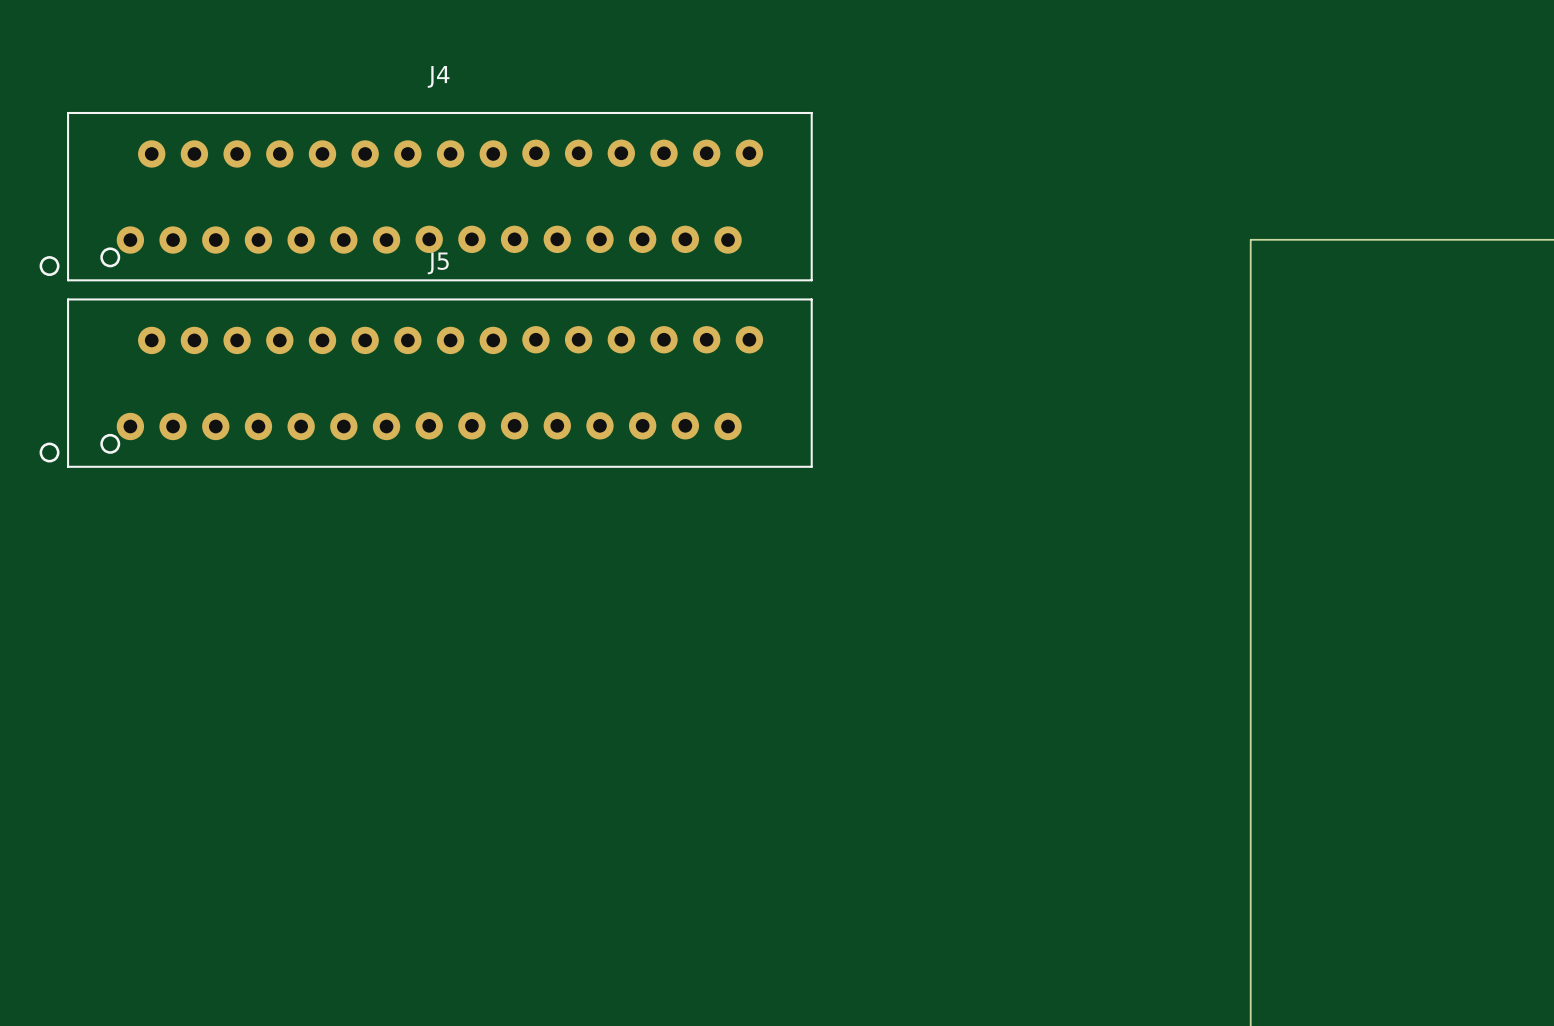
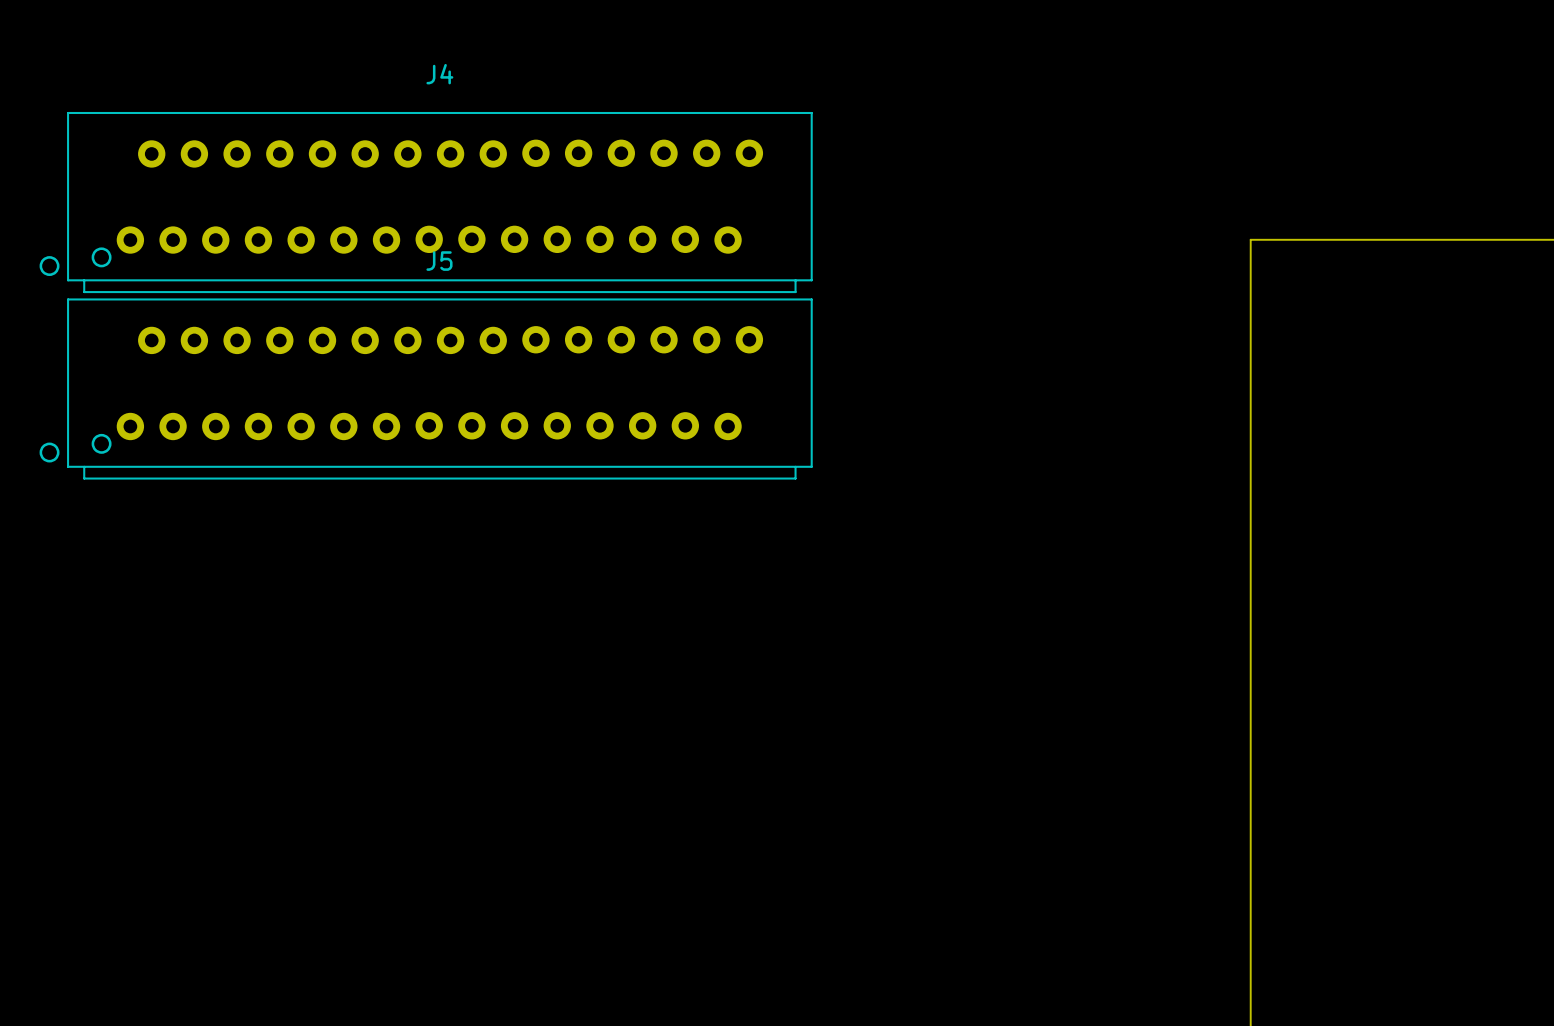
J4 footprint: [39, 111, 813, 282] -> [39, 111, 813, 294]
J5 footprint: [39, 298, 813, 468] -> [39, 298, 813, 480]

